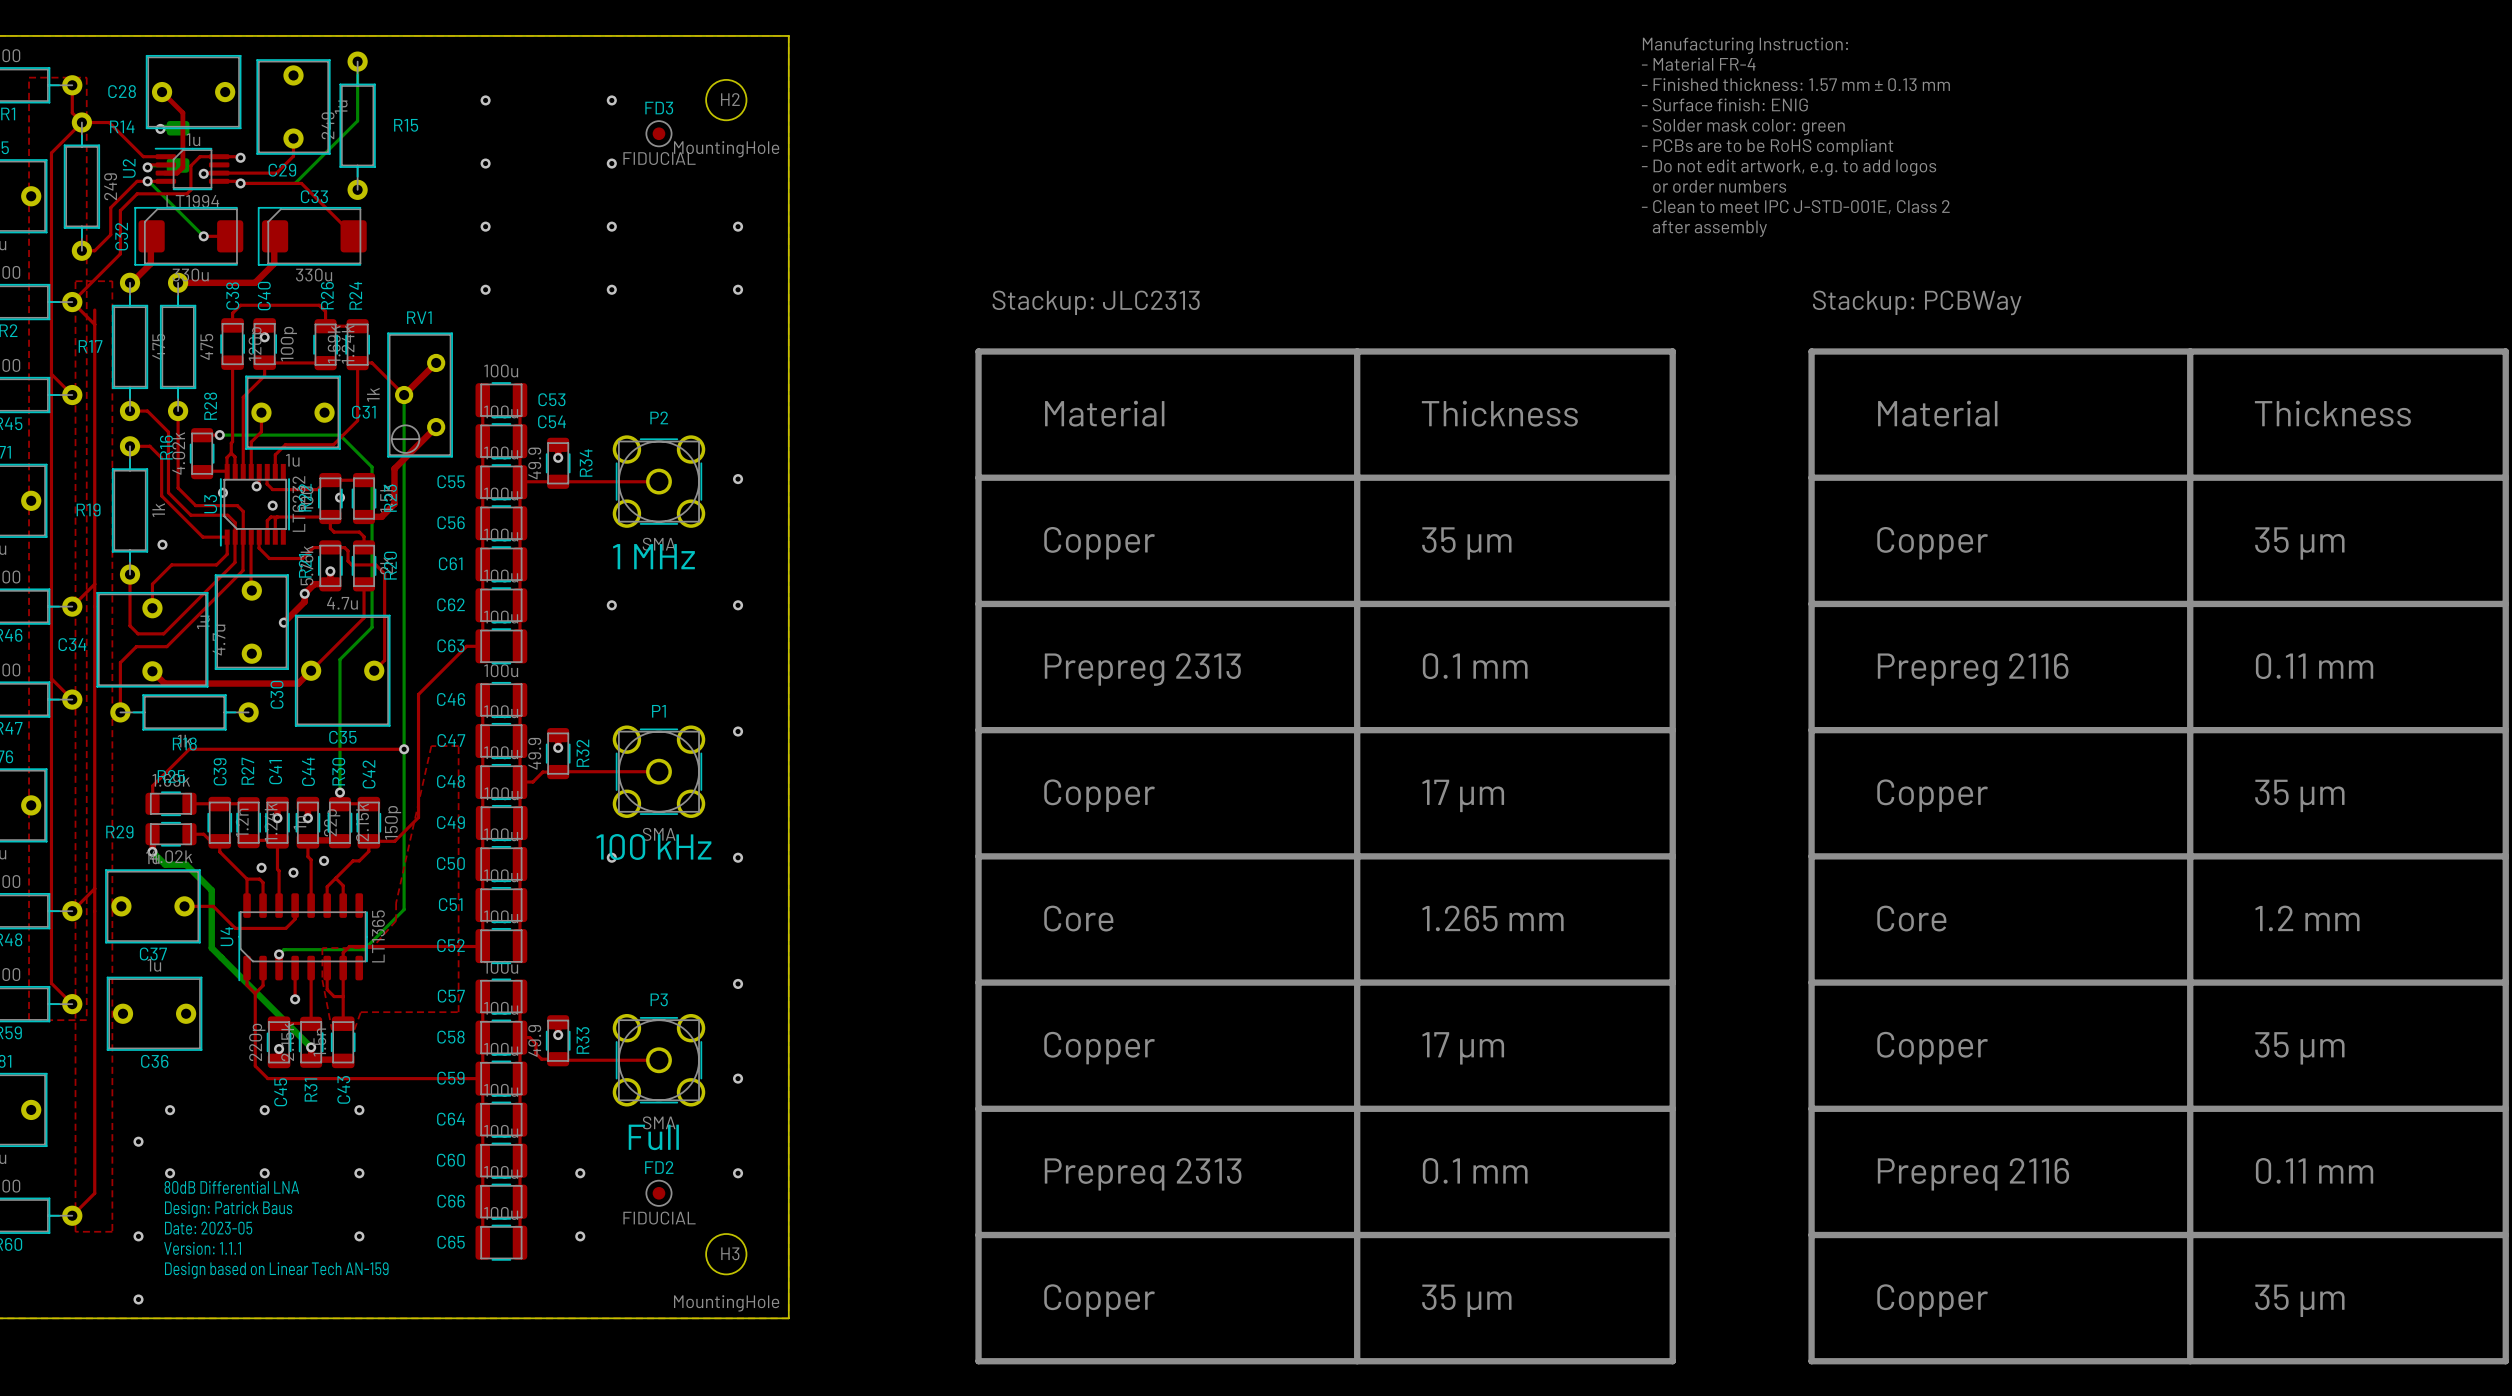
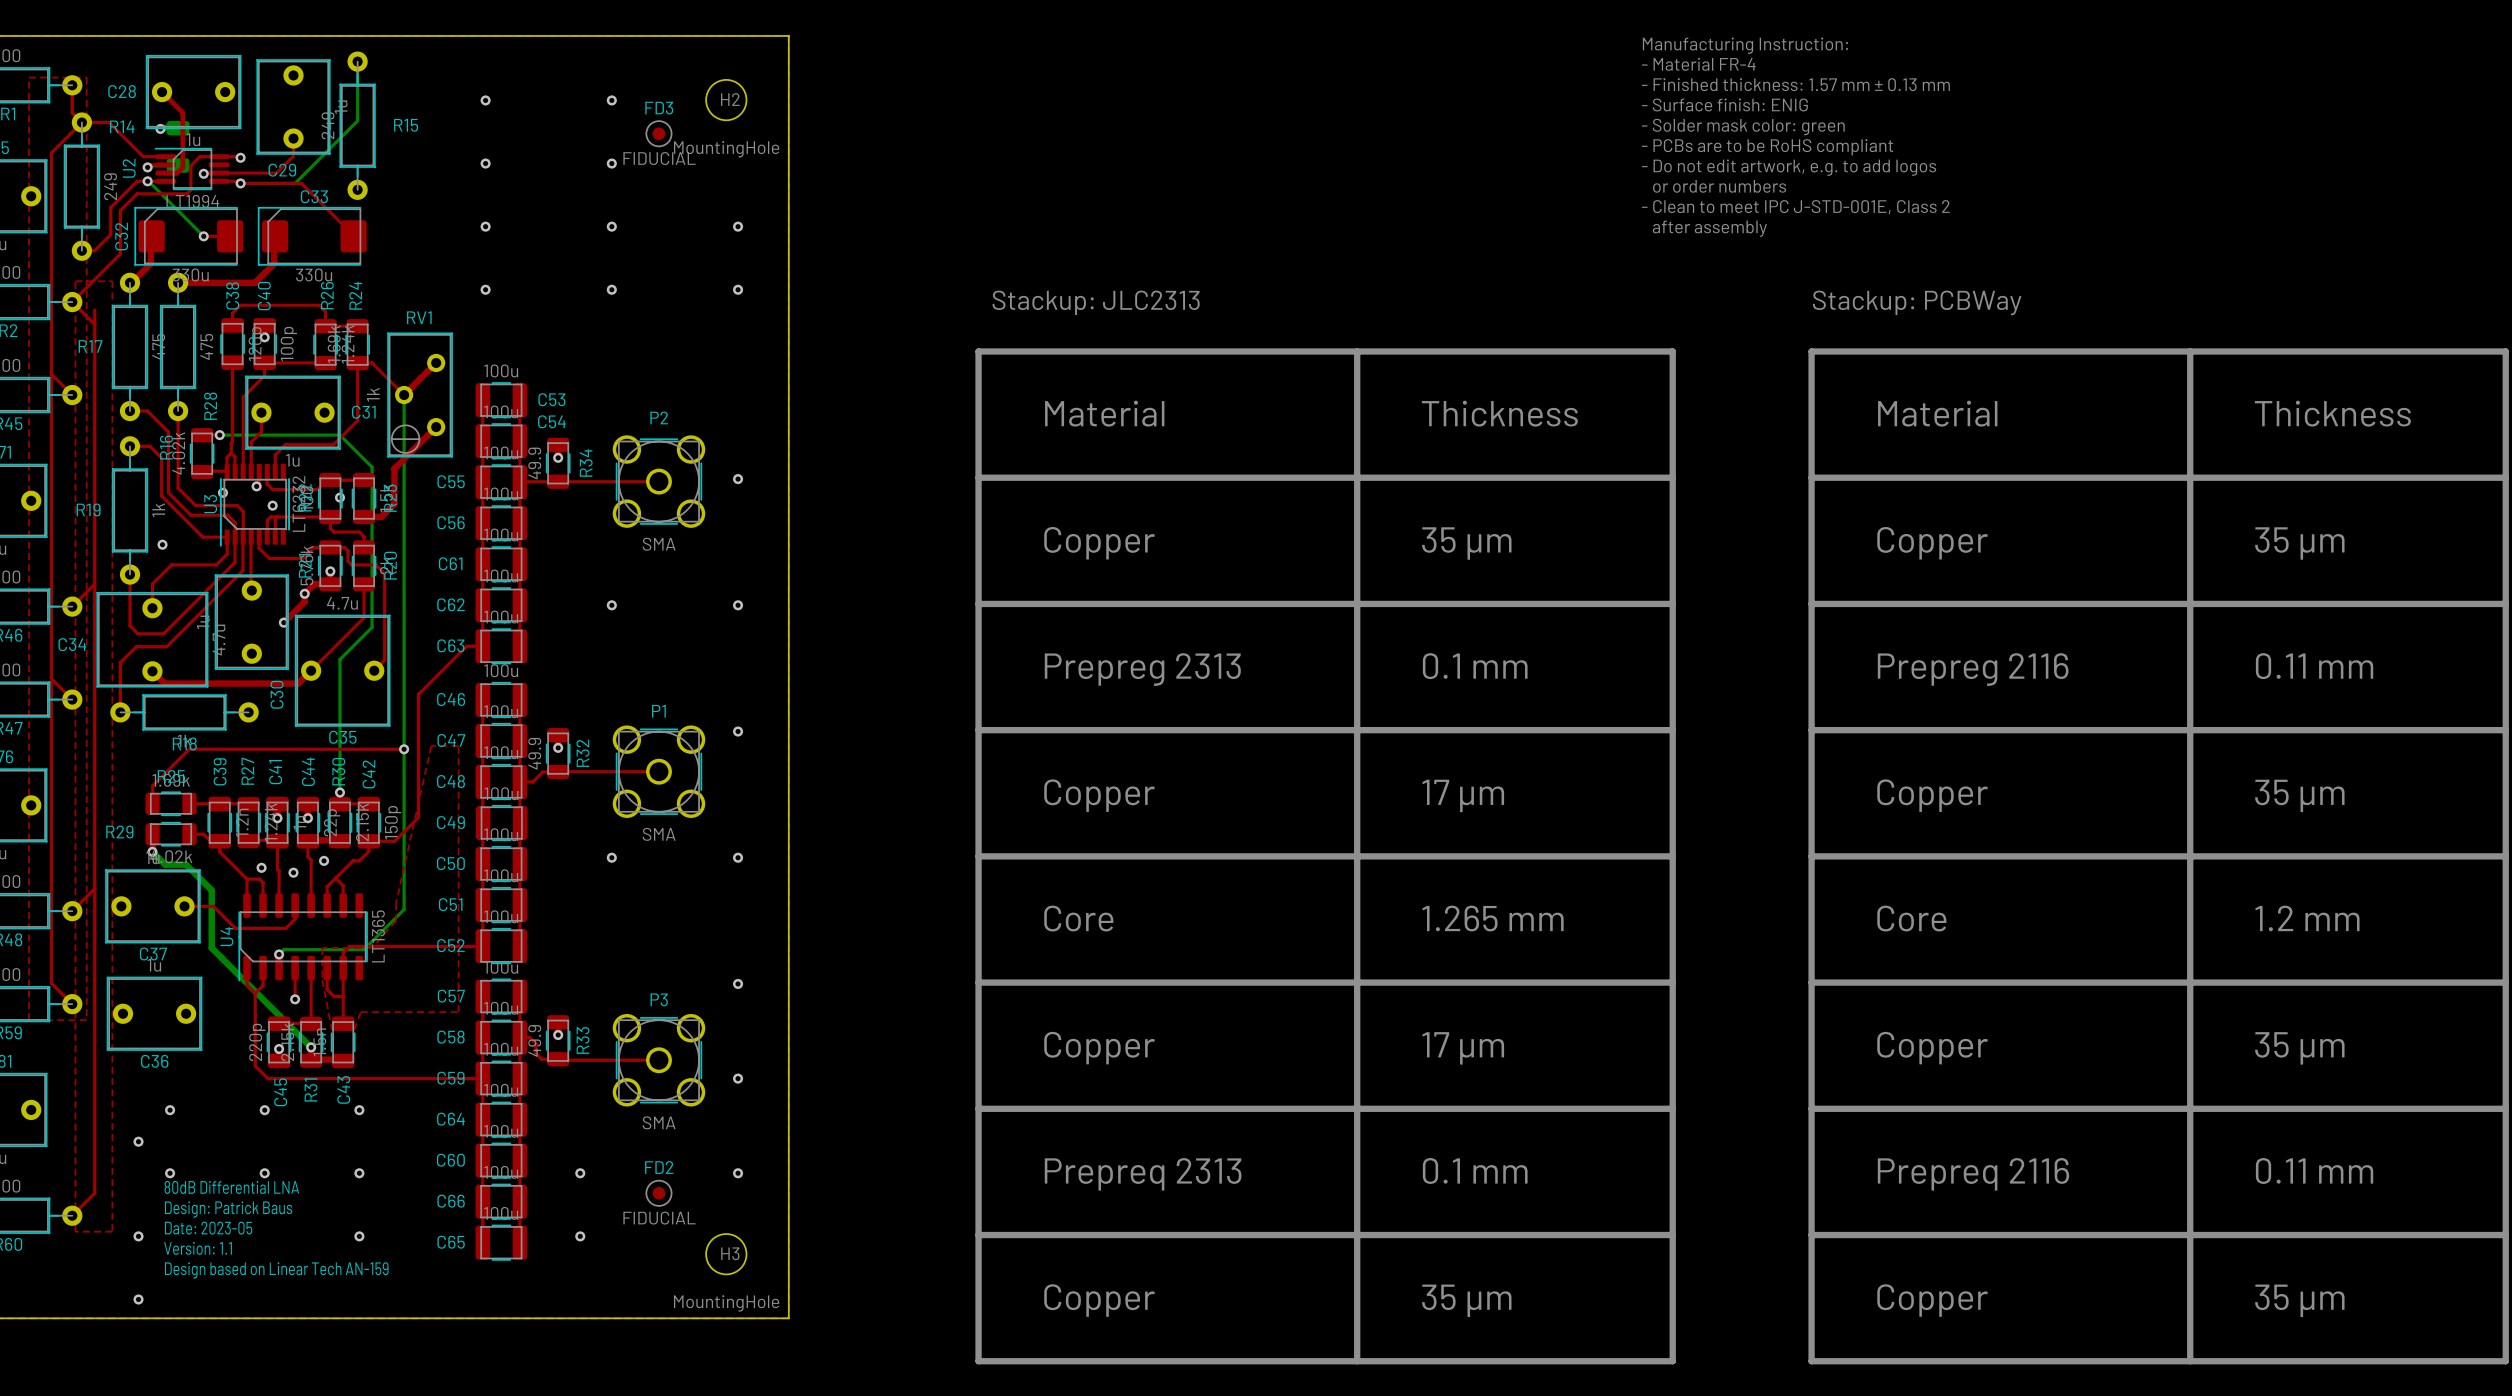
text: 1 MHz (653, 556) -> none
text: 100 kHz (653, 846) -> none
text: Full (653, 1137) -> none
text: Version: 1.1.1 (202, 1248) -> Version: 1.1 (198, 1248)

